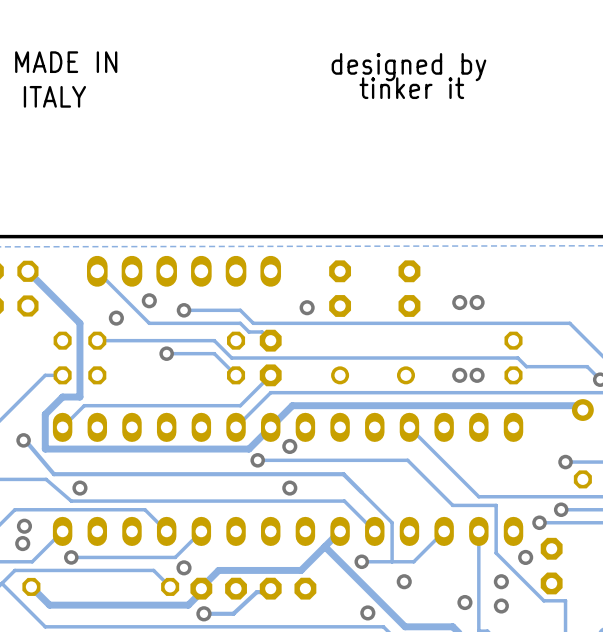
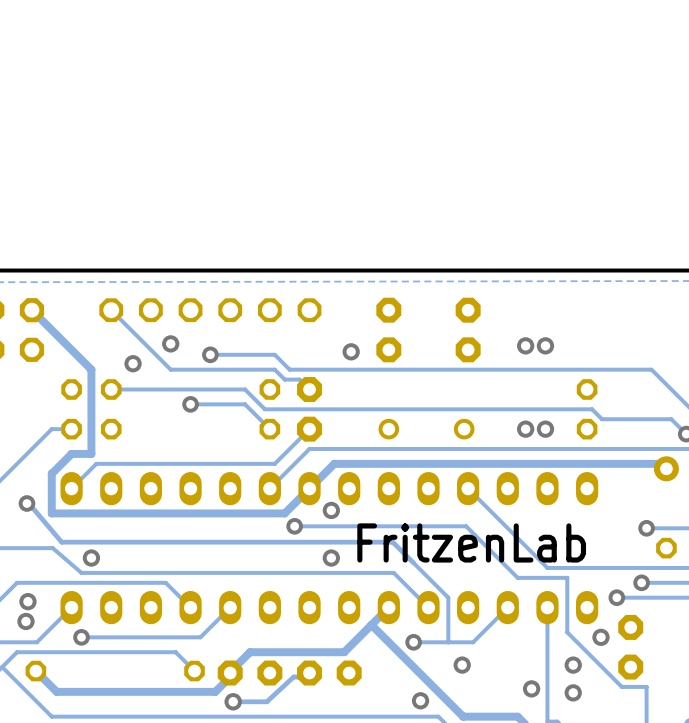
text: MADE IN (66, 62) -> none
text: designed by (408, 67) -> none
text: tinker it (411, 88) -> none
text: ITALY (54, 96) -> none
part footprint: [87, 255, 282, 287] -> [99, 298, 322, 323]
text: none -> FritzenLab (471, 542)
via: (184, 567) -> none

